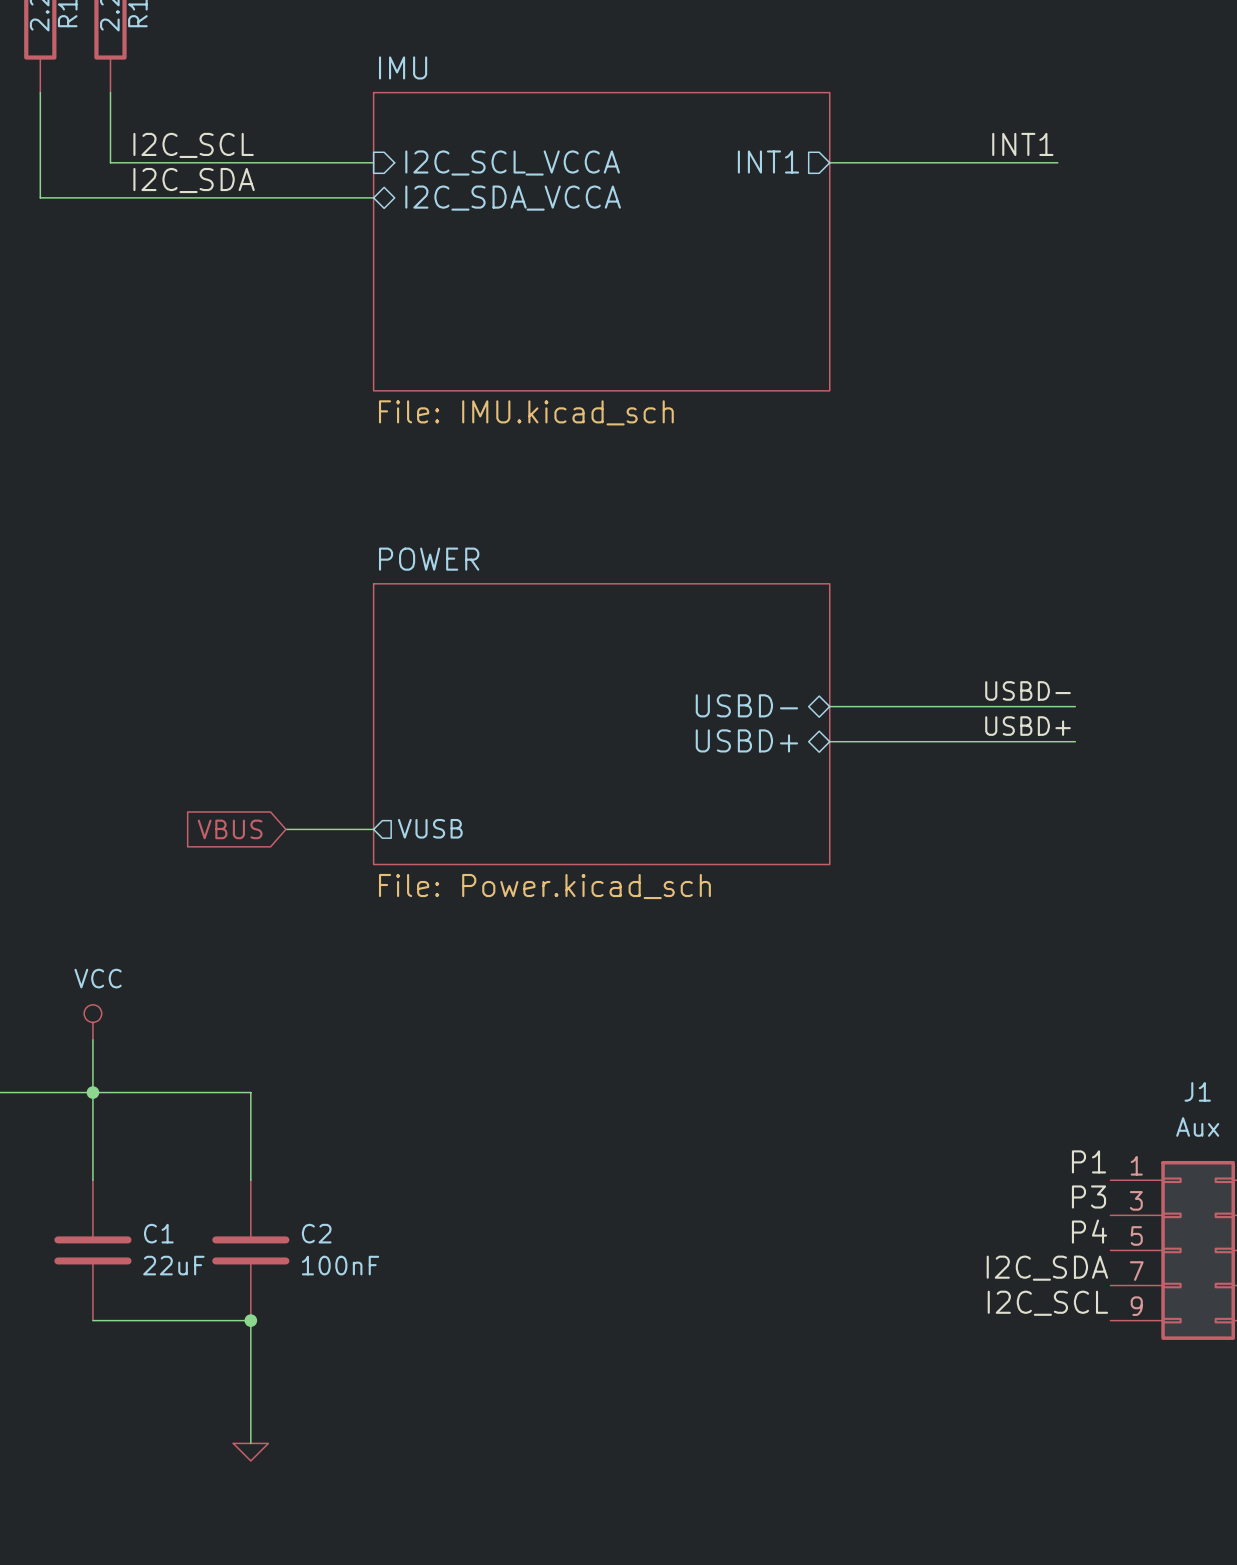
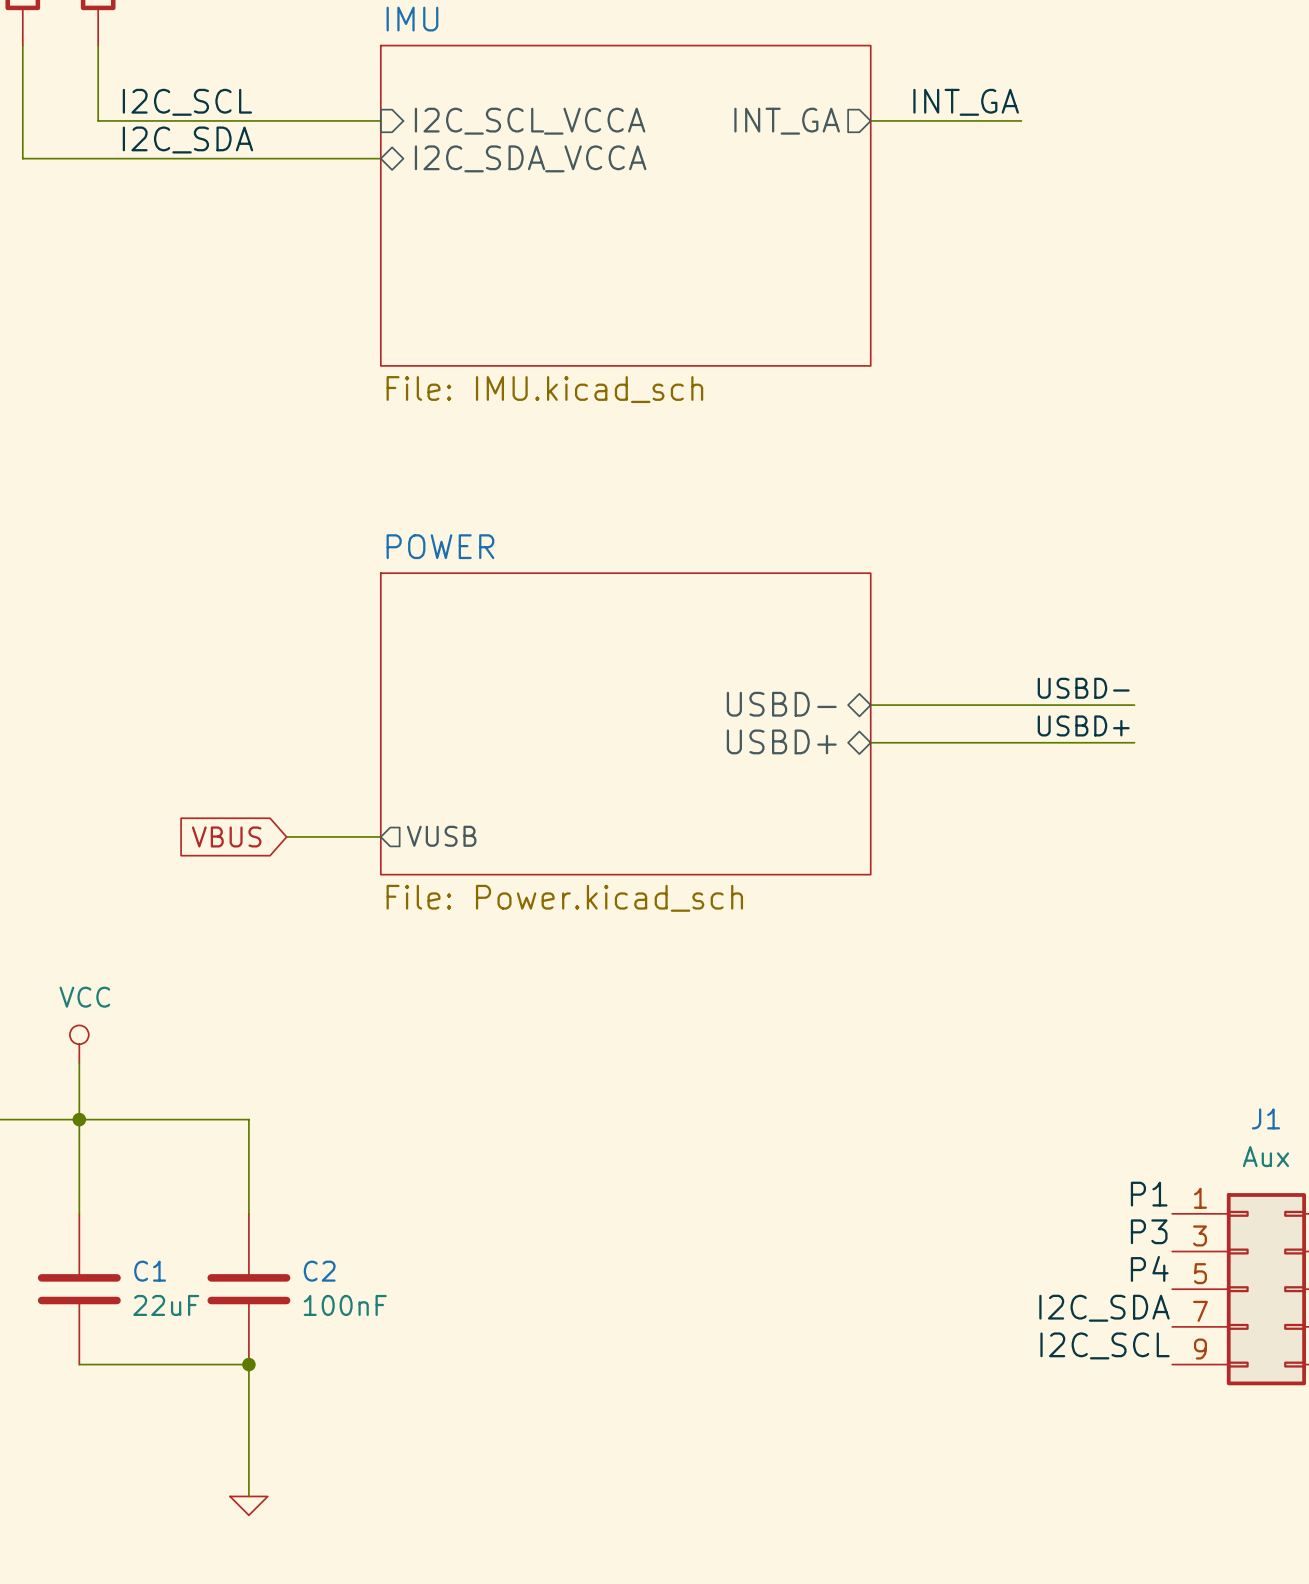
label: INT1 (1022, 144) -> none
label: none -> INT_GA (966, 102)
sheet pin: INT1 (768, 162) -> INT_GA (787, 121)
wire: (970, 162) (1057, 162) -> none

